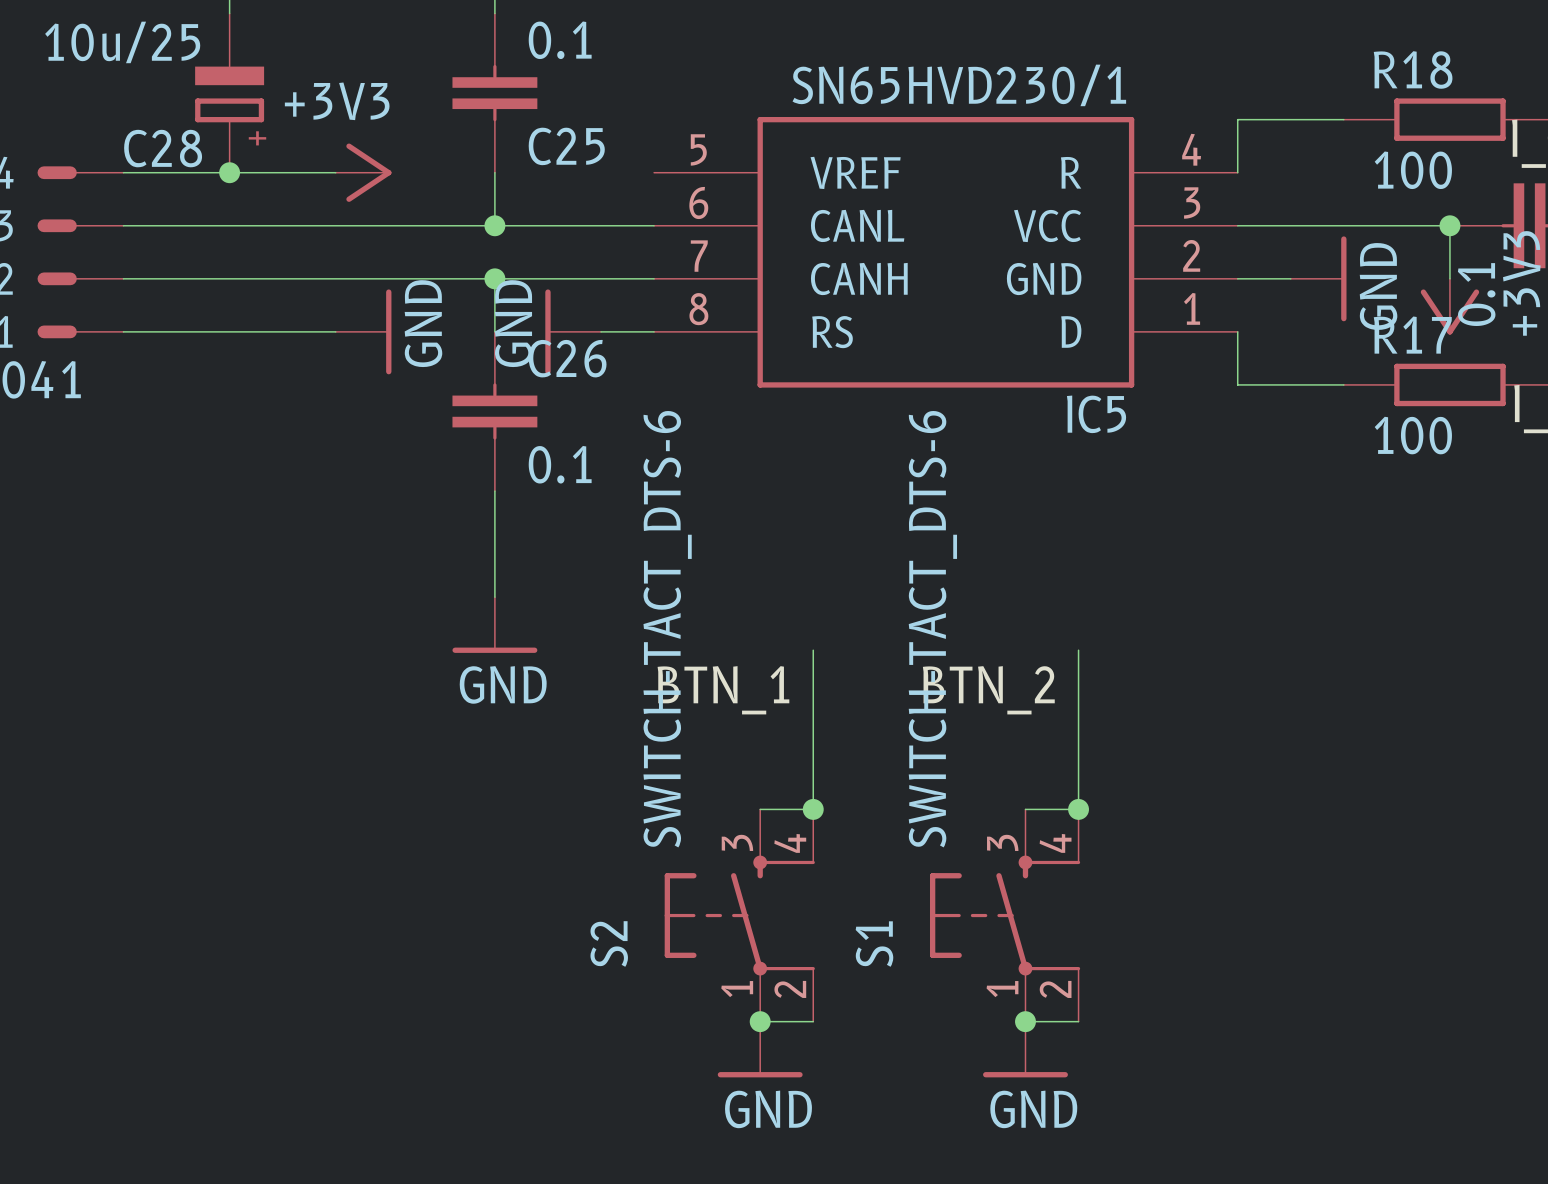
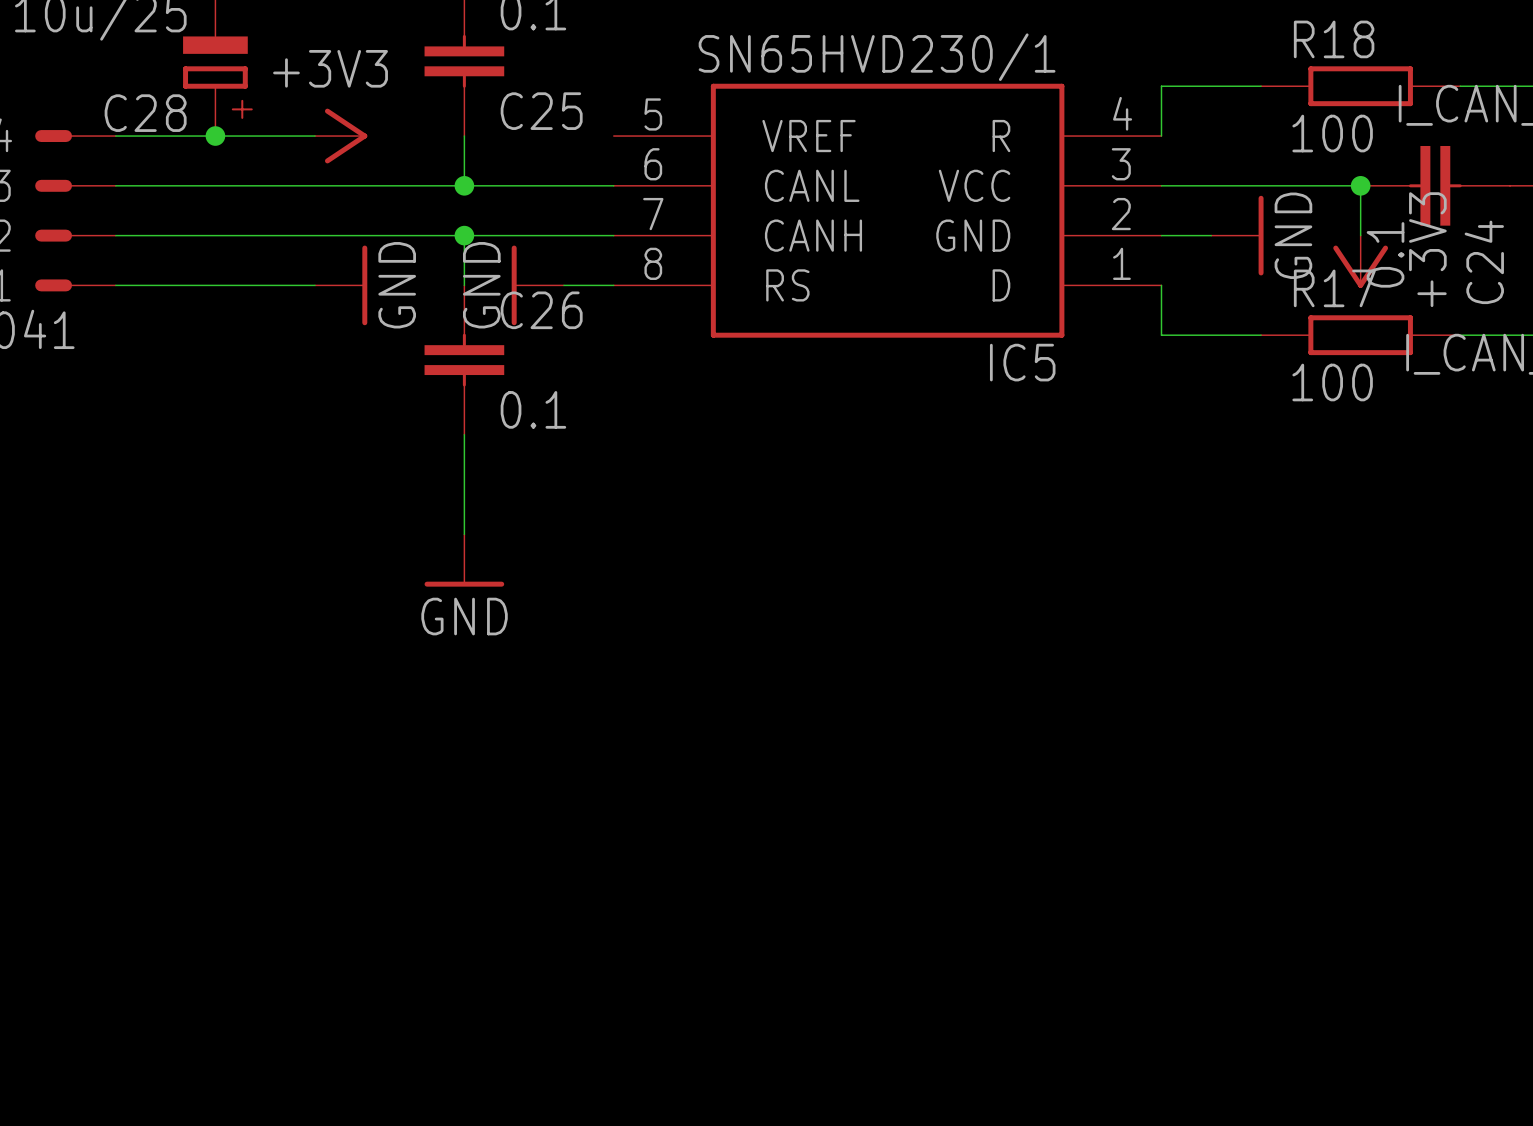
wire: (813, 650) (813, 809) (760, 809) -> none
wire: (1078, 650) (1078, 809) (1025, 809) -> none
label: BTN_1 (723, 690) -> none
label: BTN_2 (988, 690) -> none
junction: (813, 809) -> none
junction: (1078, 809) -> none
S2: SWITCH-TACT_DTS-6 (739, 915) -> none
S1: SWITCH-TACT_DTS-6 (1005, 915) -> none
wire: (760, 1021) (813, 1021) -> none
junction: (760, 1021) -> none
wire: (1025, 1021) (1078, 1021) -> none
junction: (1025, 1021) -> none
power symbol: GND (760, 1049) -> none
power symbol: GND (1025, 1049) -> none

